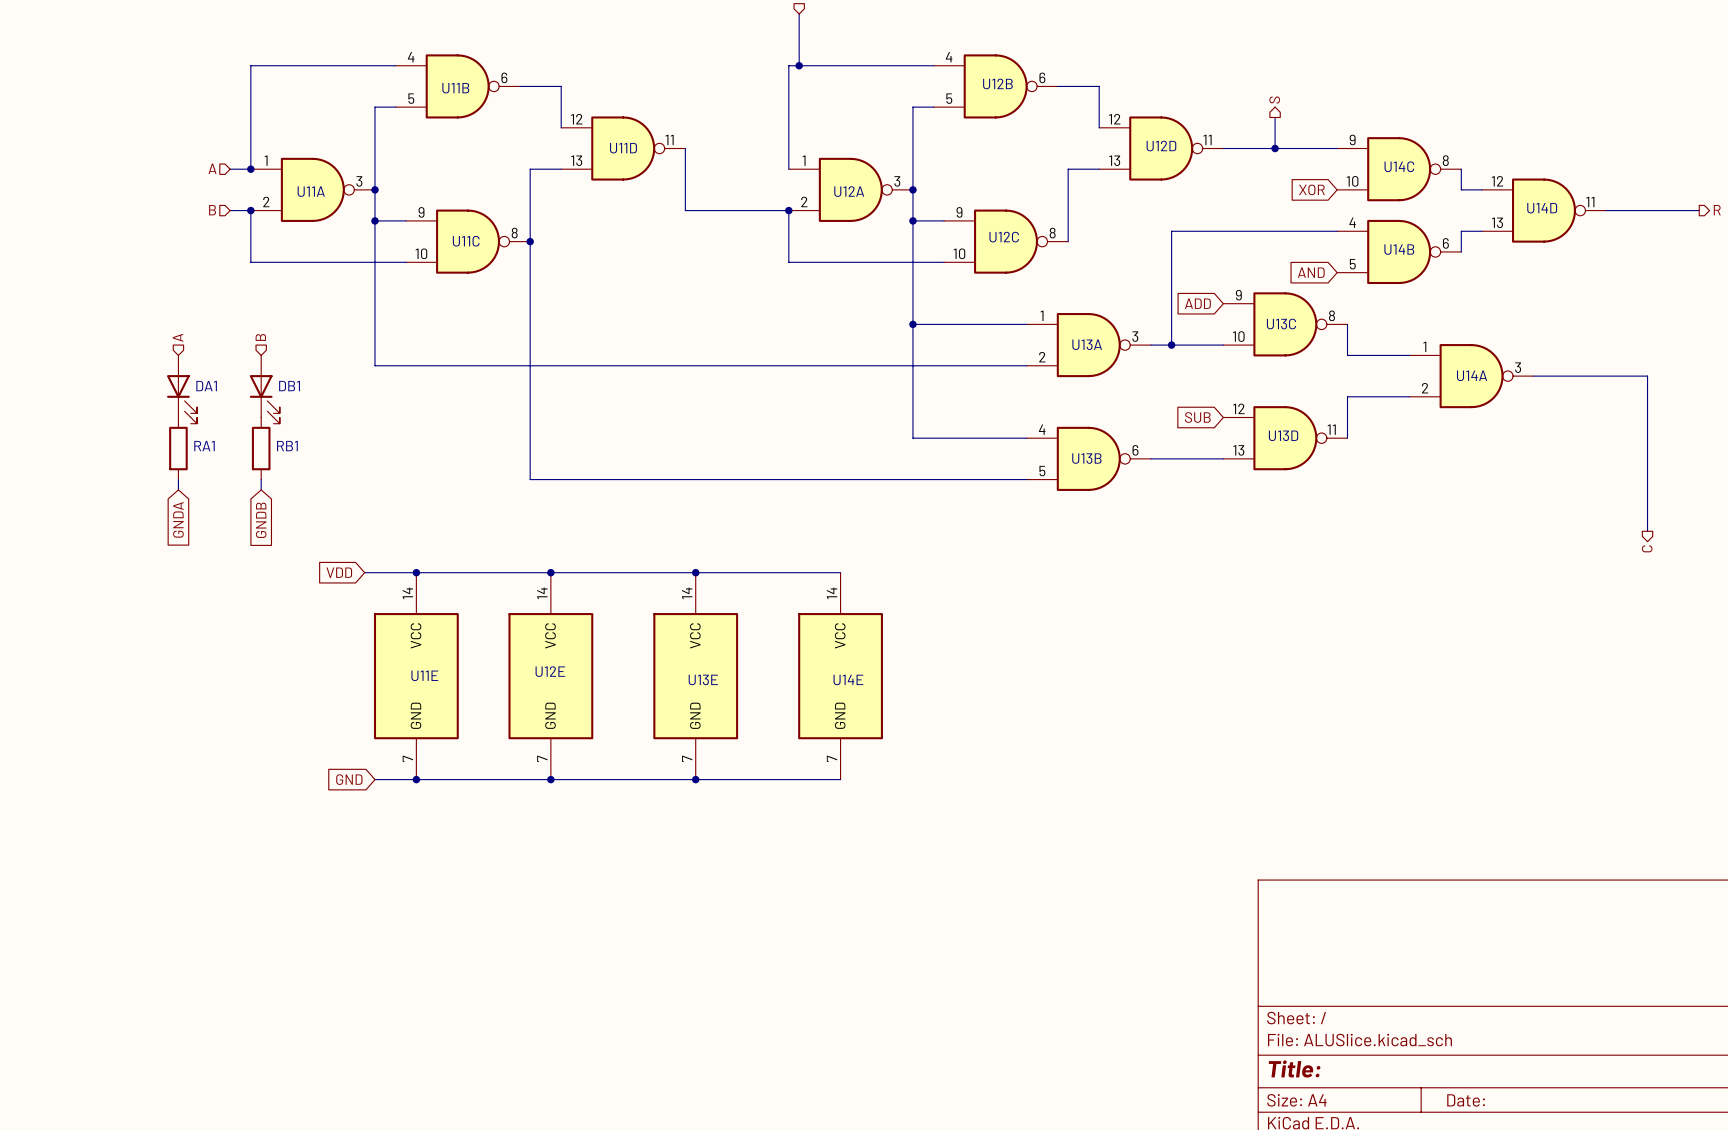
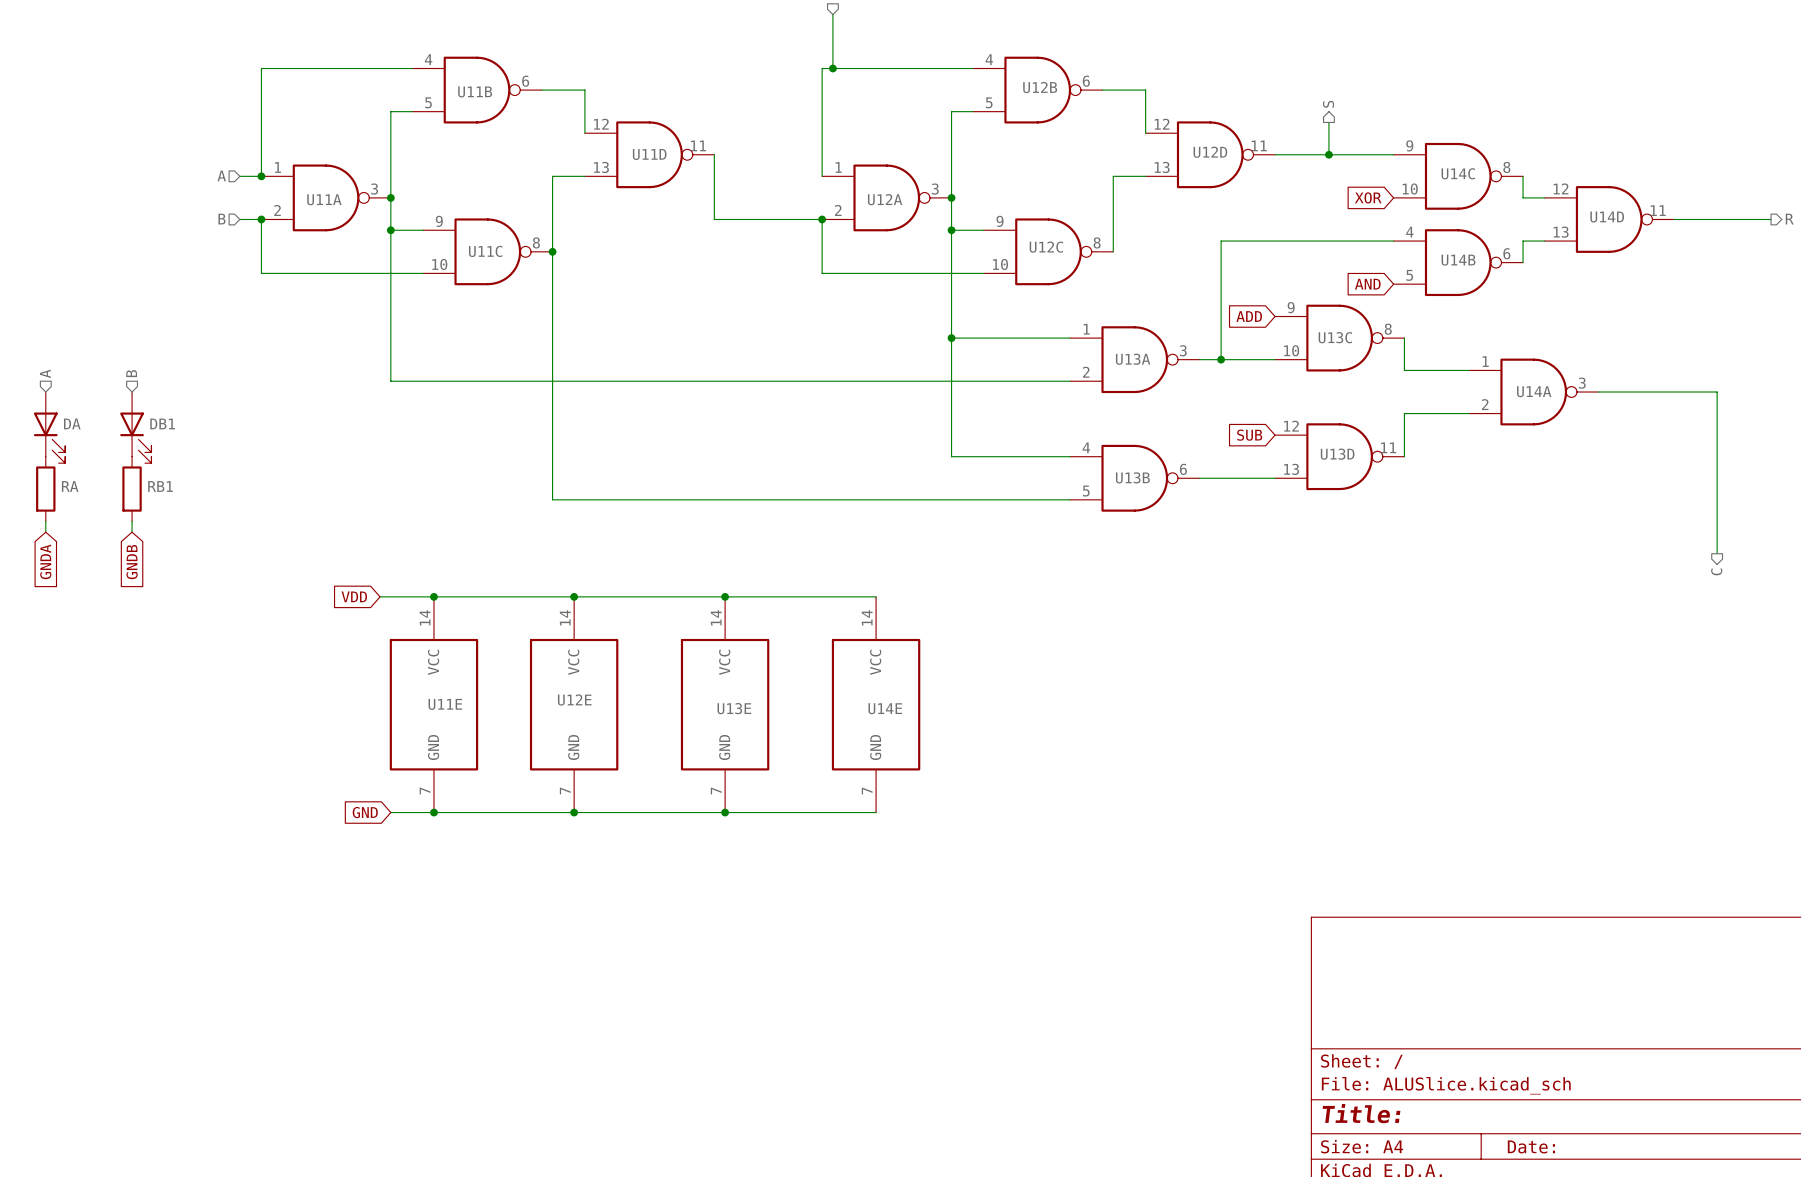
hierarchical label position: A (178, 337) -> A (45, 373)
hierarchical label position: B (260, 337) -> B (131, 373)
DA1: (182, 389) -> none
DB1 position: (264, 389) -> (135, 427)
DA: none -> (49, 427)
RA1: (178, 448) -> none
RB1 position: (261, 448) -> (132, 489)
RA: none -> (45, 489)
wire: (178, 479) (178, 489) -> (45, 521) (45, 532)
wire: (261, 479) (261, 489) -> (132, 521) (132, 532)
global label position: GNDA (178, 519) -> GNDA (45, 561)
global label position: GNDB (261, 520) -> GNDB (132, 562)

